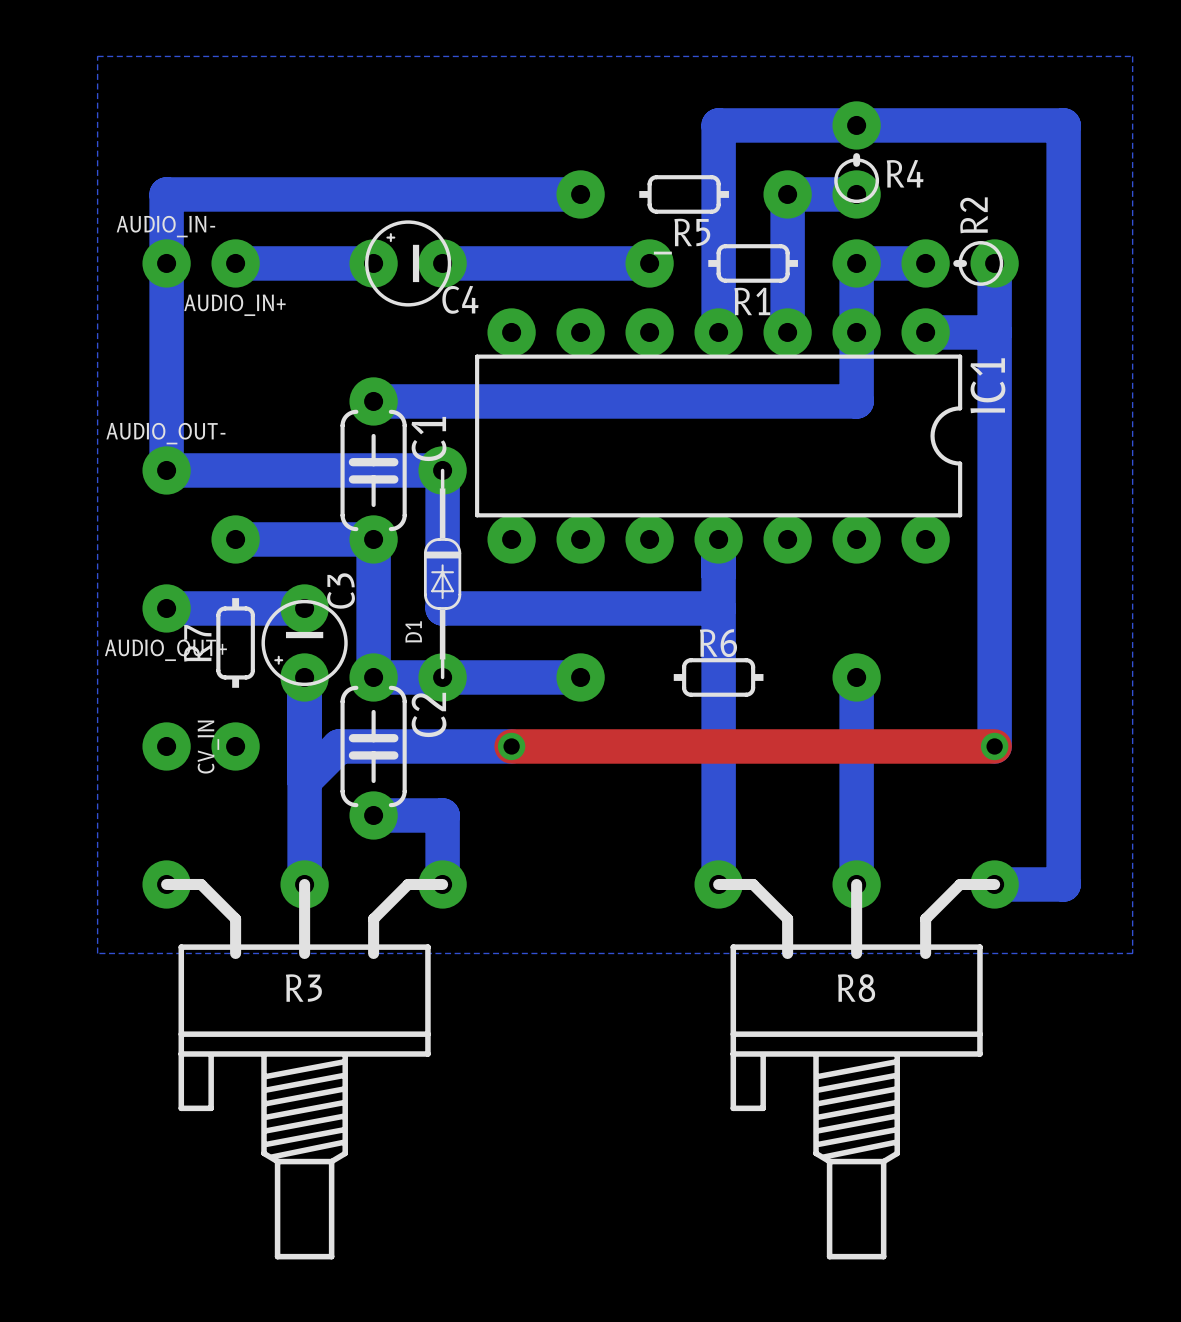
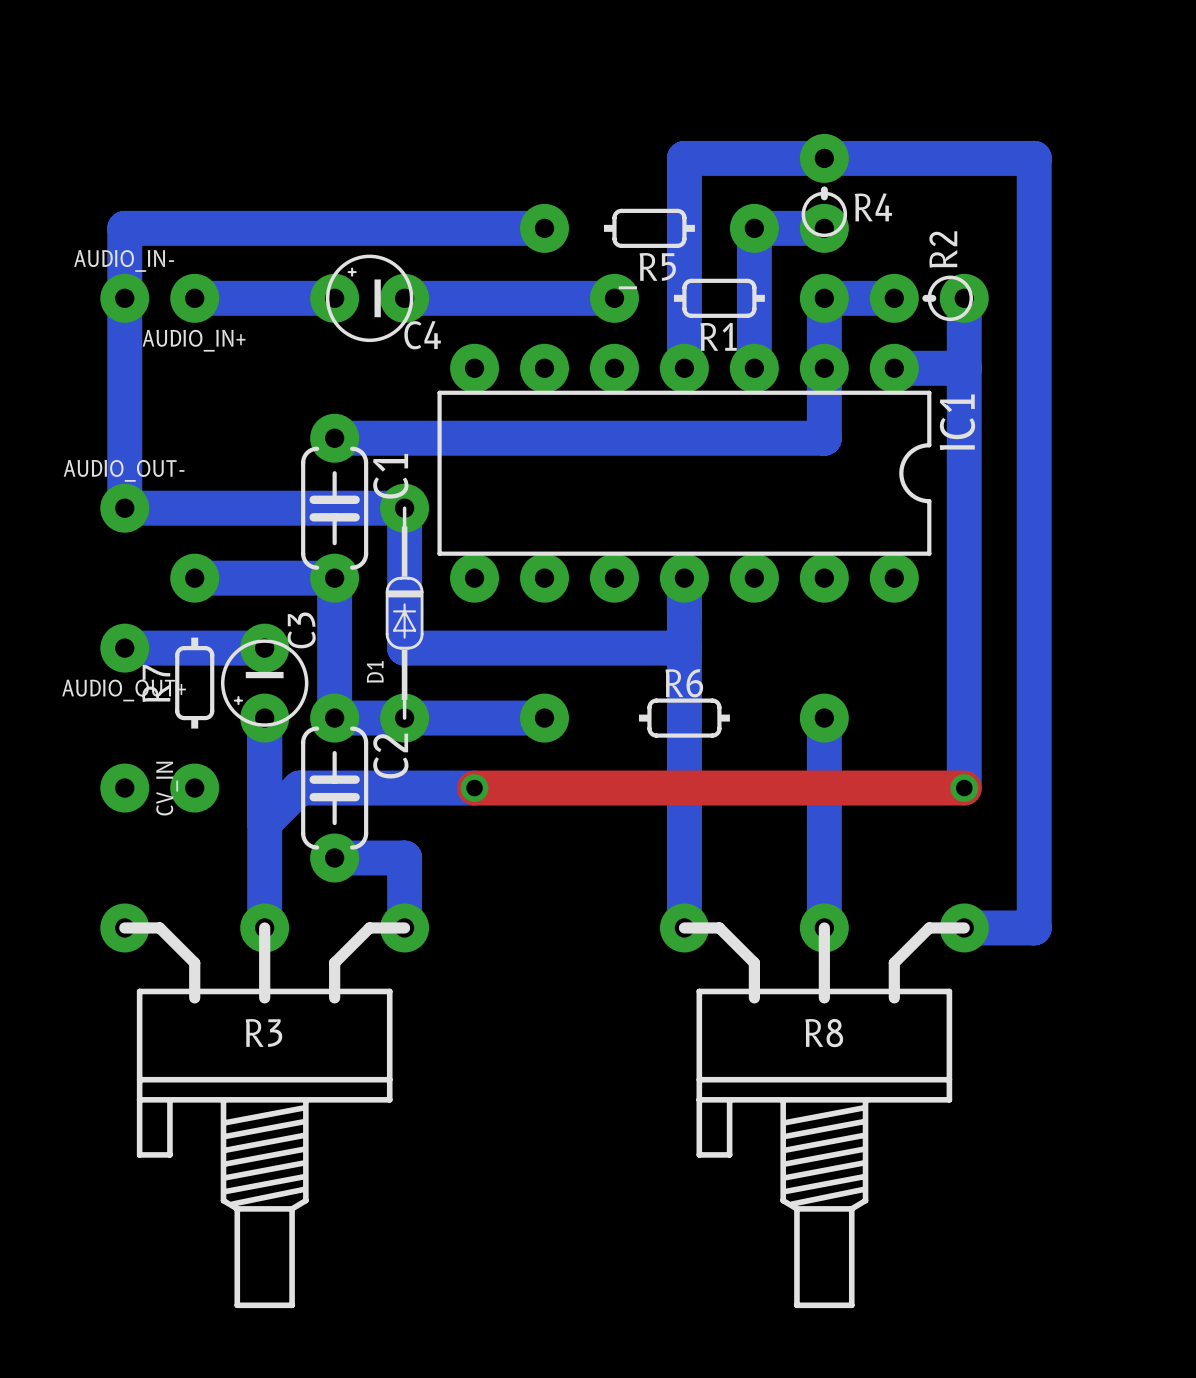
bottom zone outline: (97, 56) (97, 953) (1132, 953) (1132, 56) (97, 56) -> none

